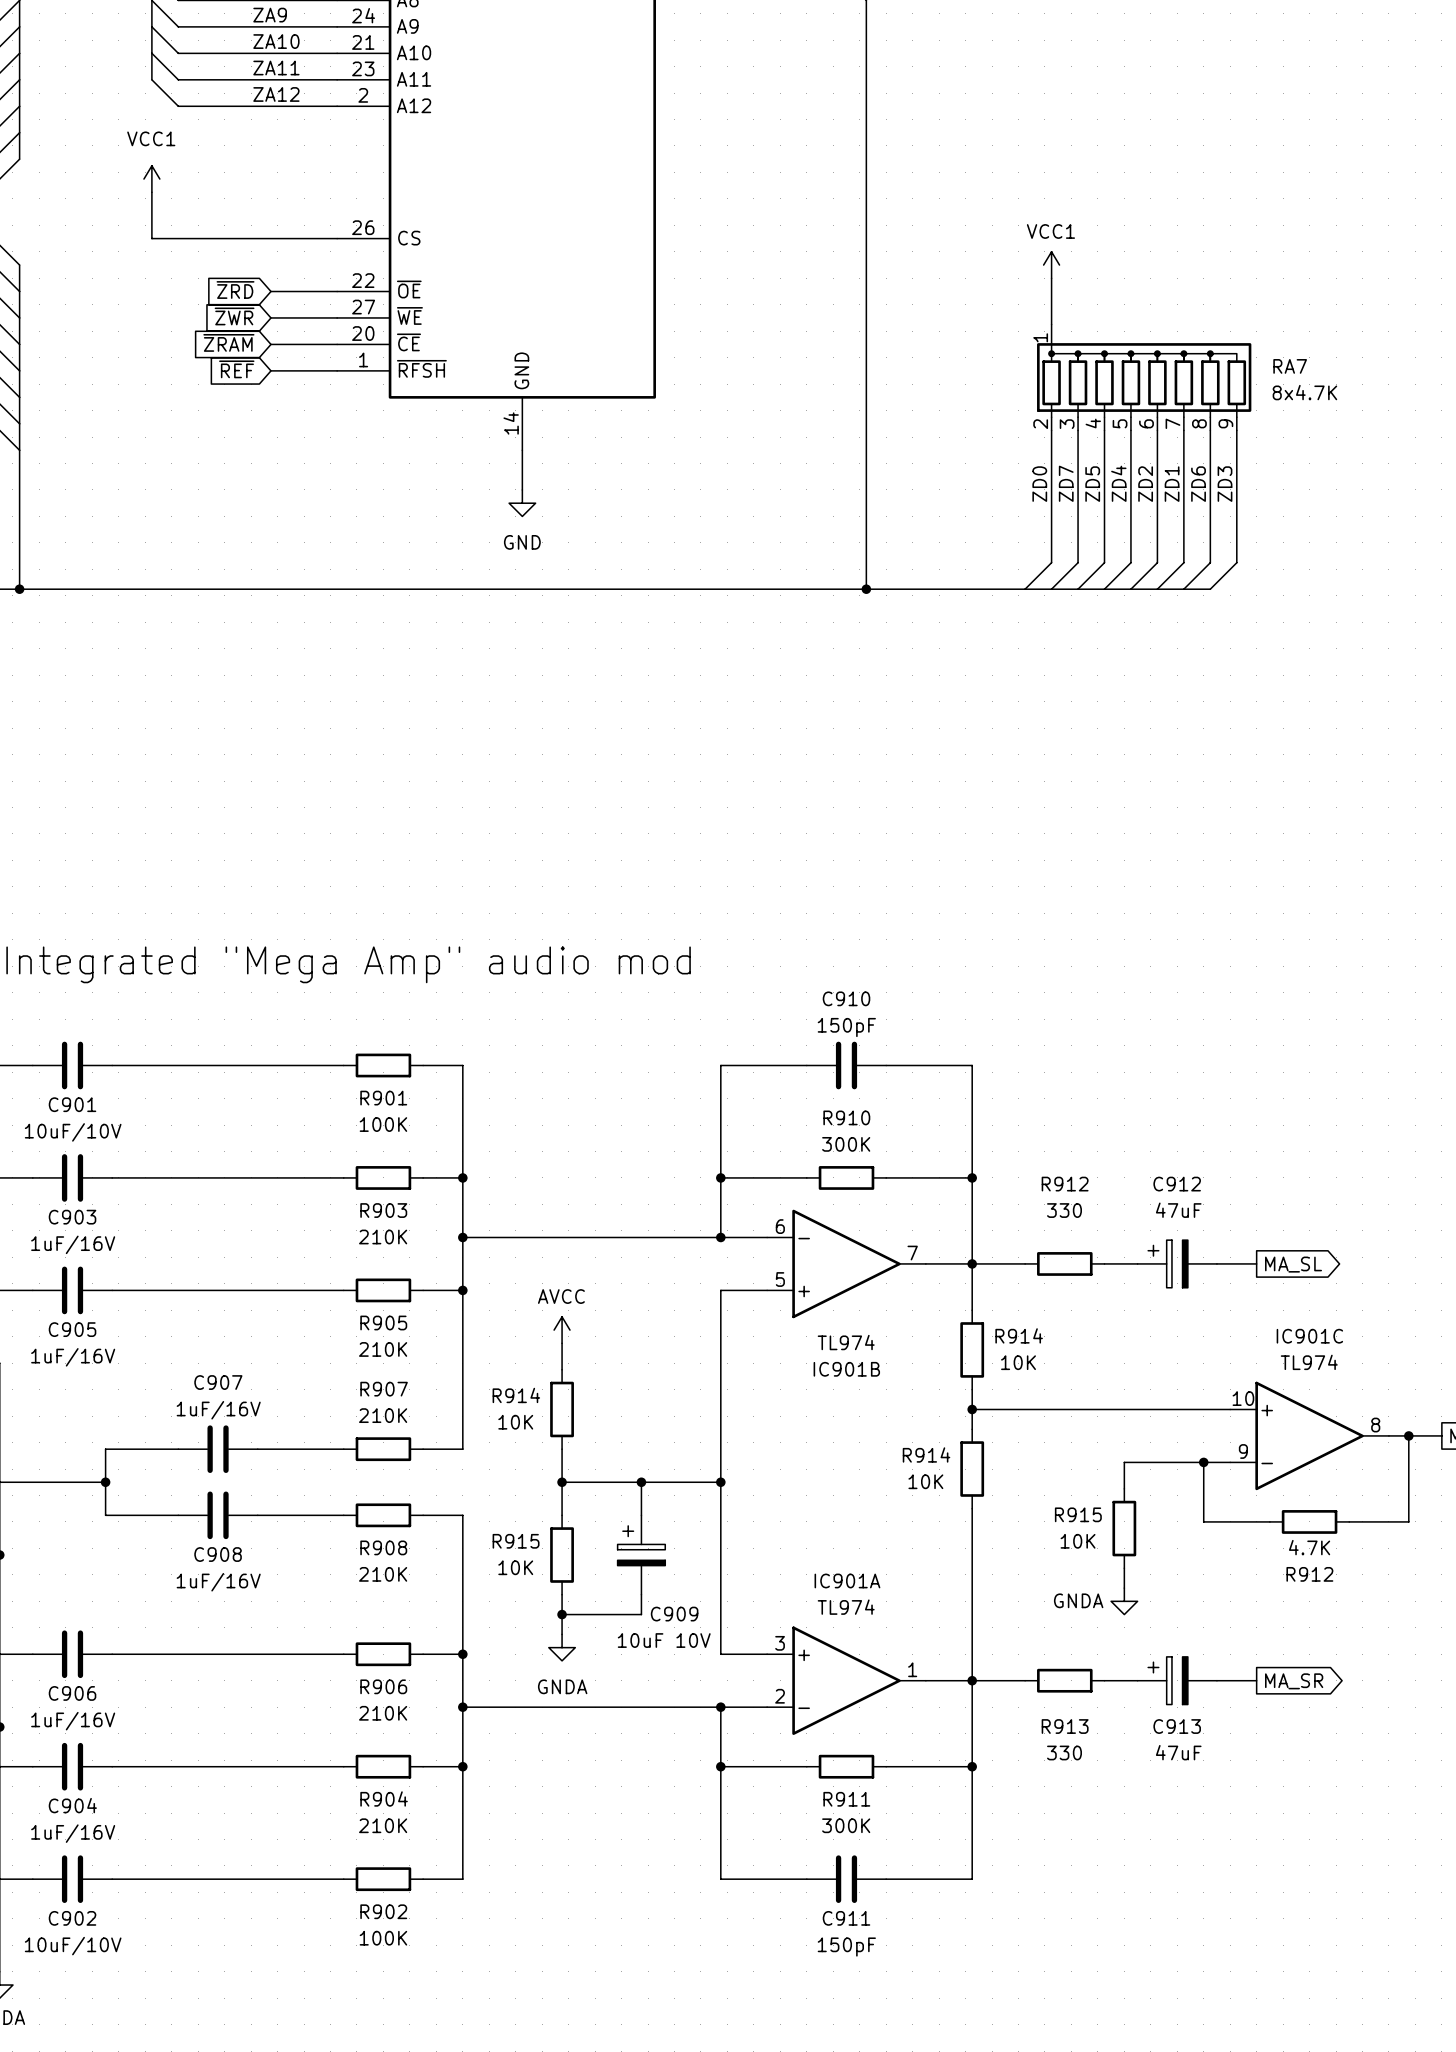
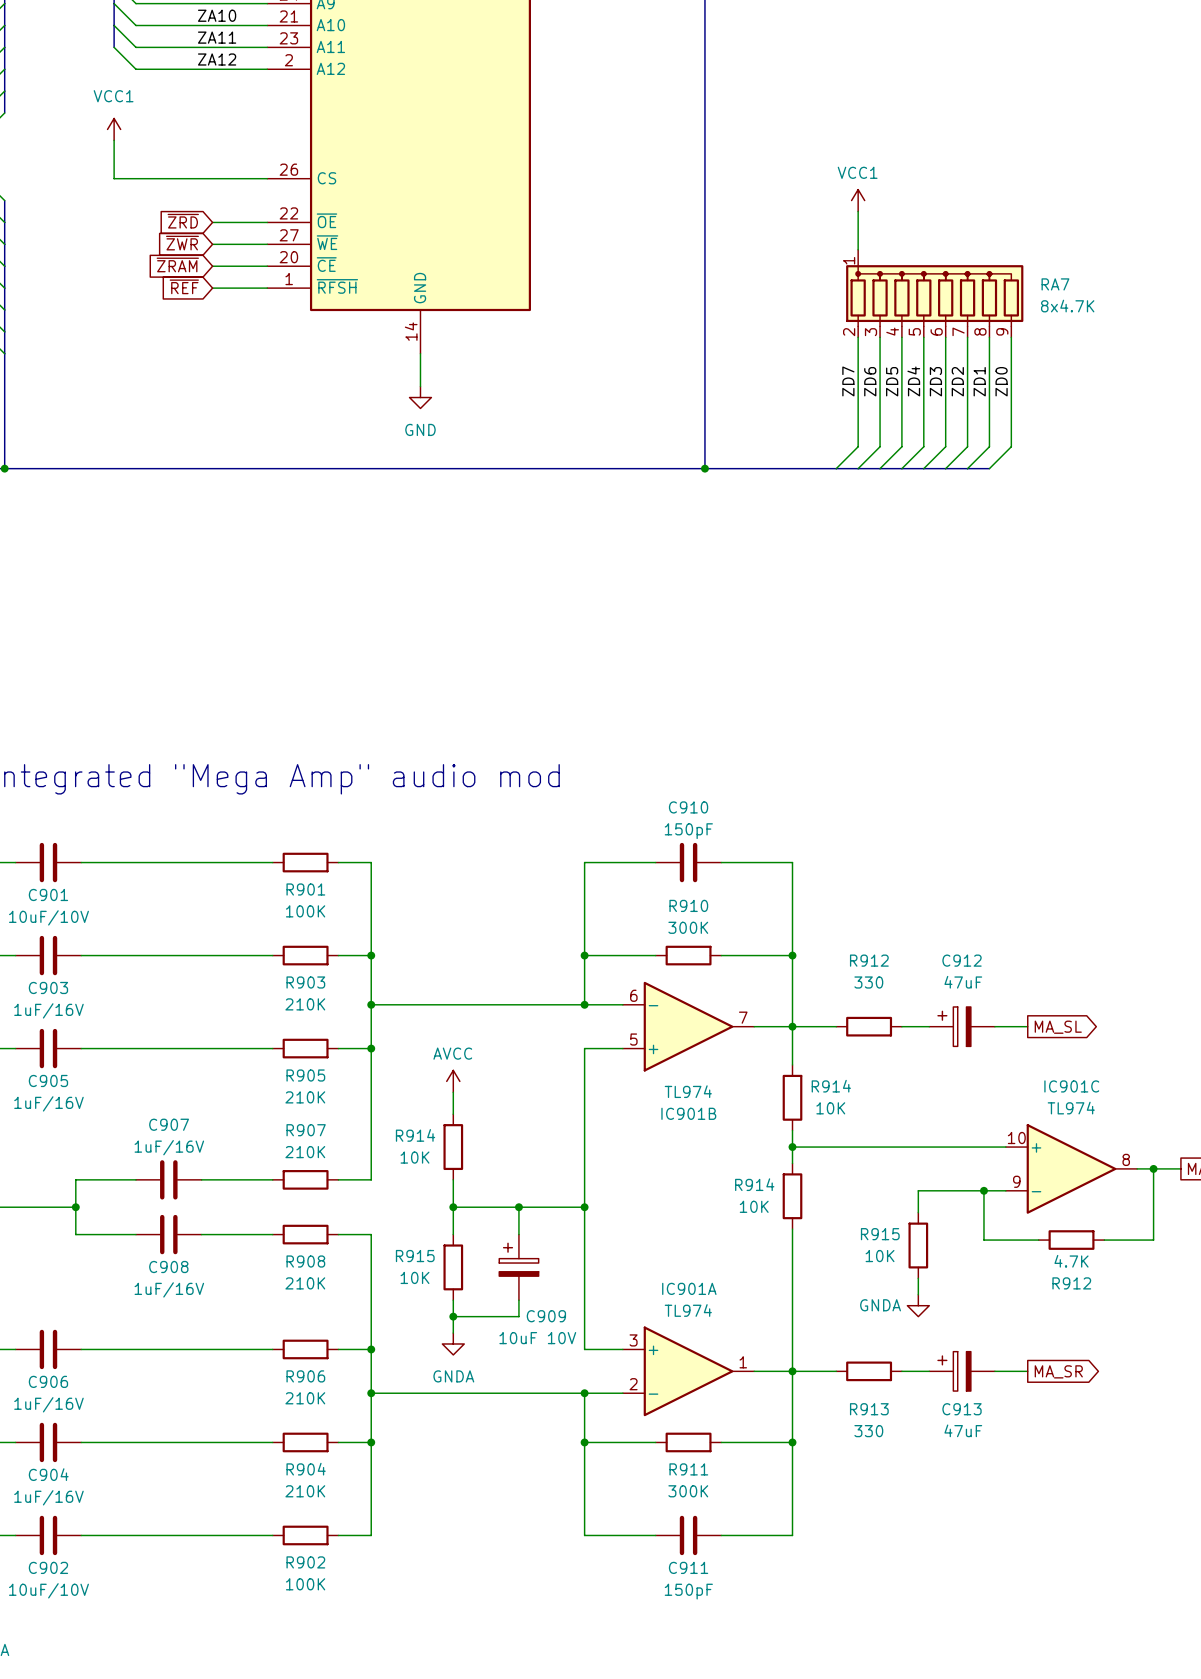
label: ZD7 (1066, 483) -> ZD6 (870, 381)
label: ZD0 (1039, 484) -> ZD7 (848, 381)
label: ZD2 (1145, 484) -> ZD3 (935, 381)
label: ZD1 (1172, 484) -> ZD2 (957, 381)
label: ZD6 (1198, 484) -> ZD1 (979, 381)
label: ZD3 (1225, 484) -> ZD0 (1001, 381)

